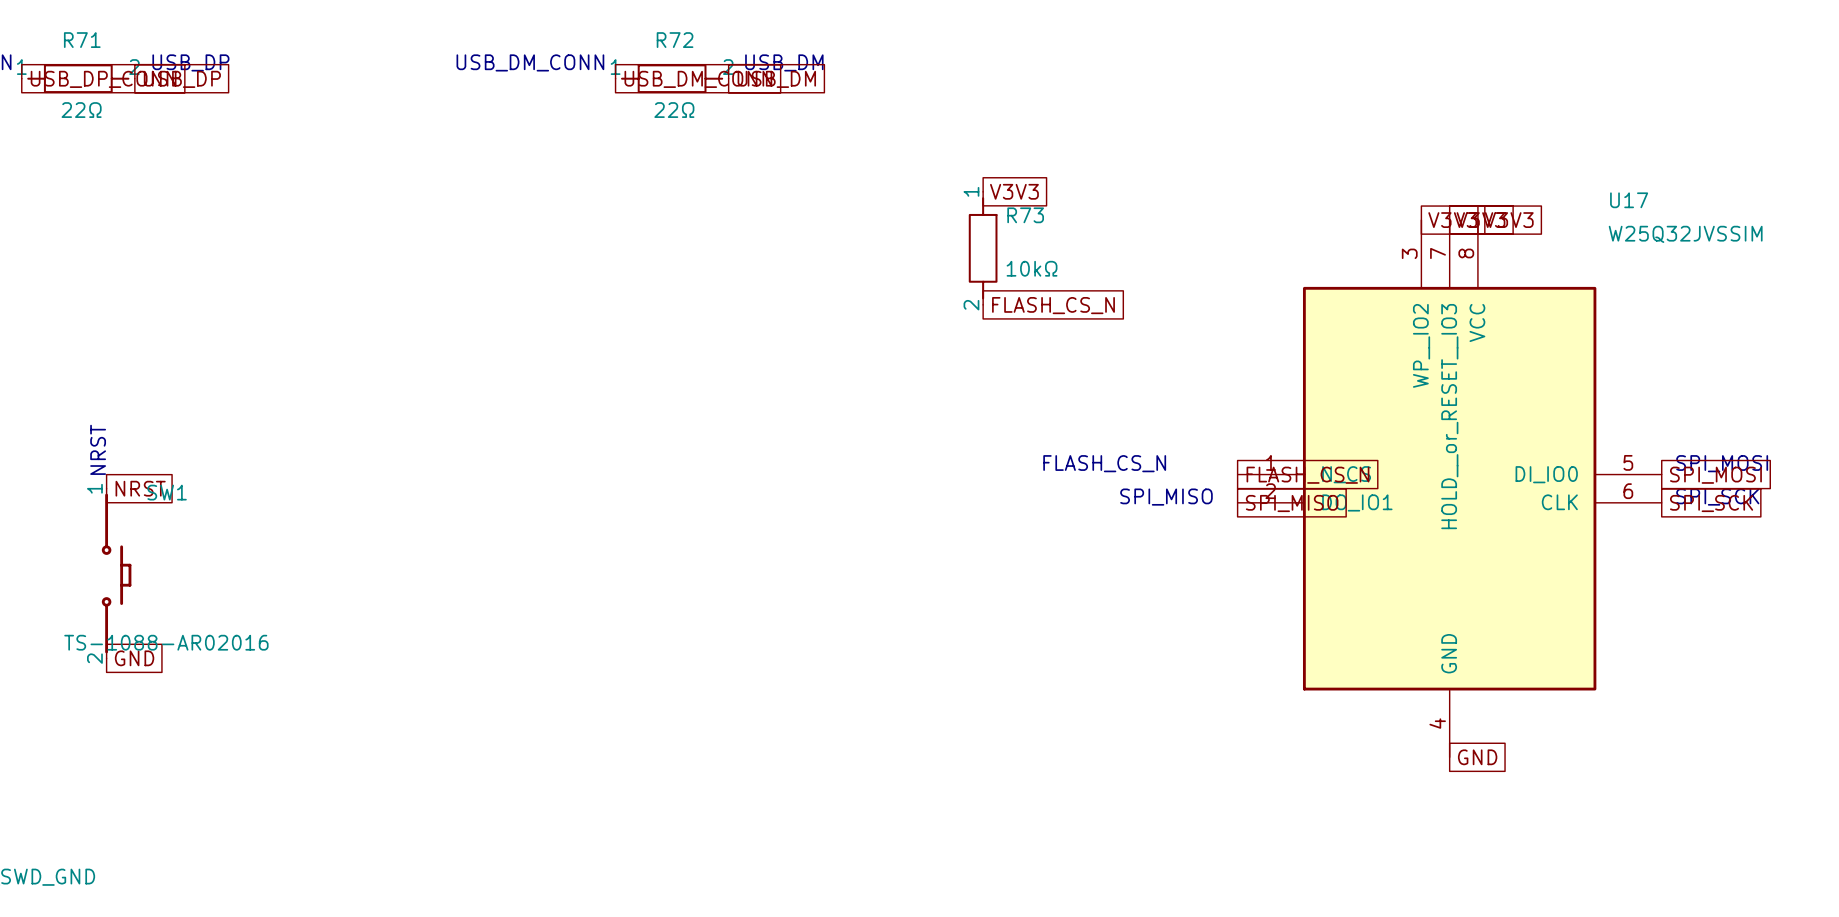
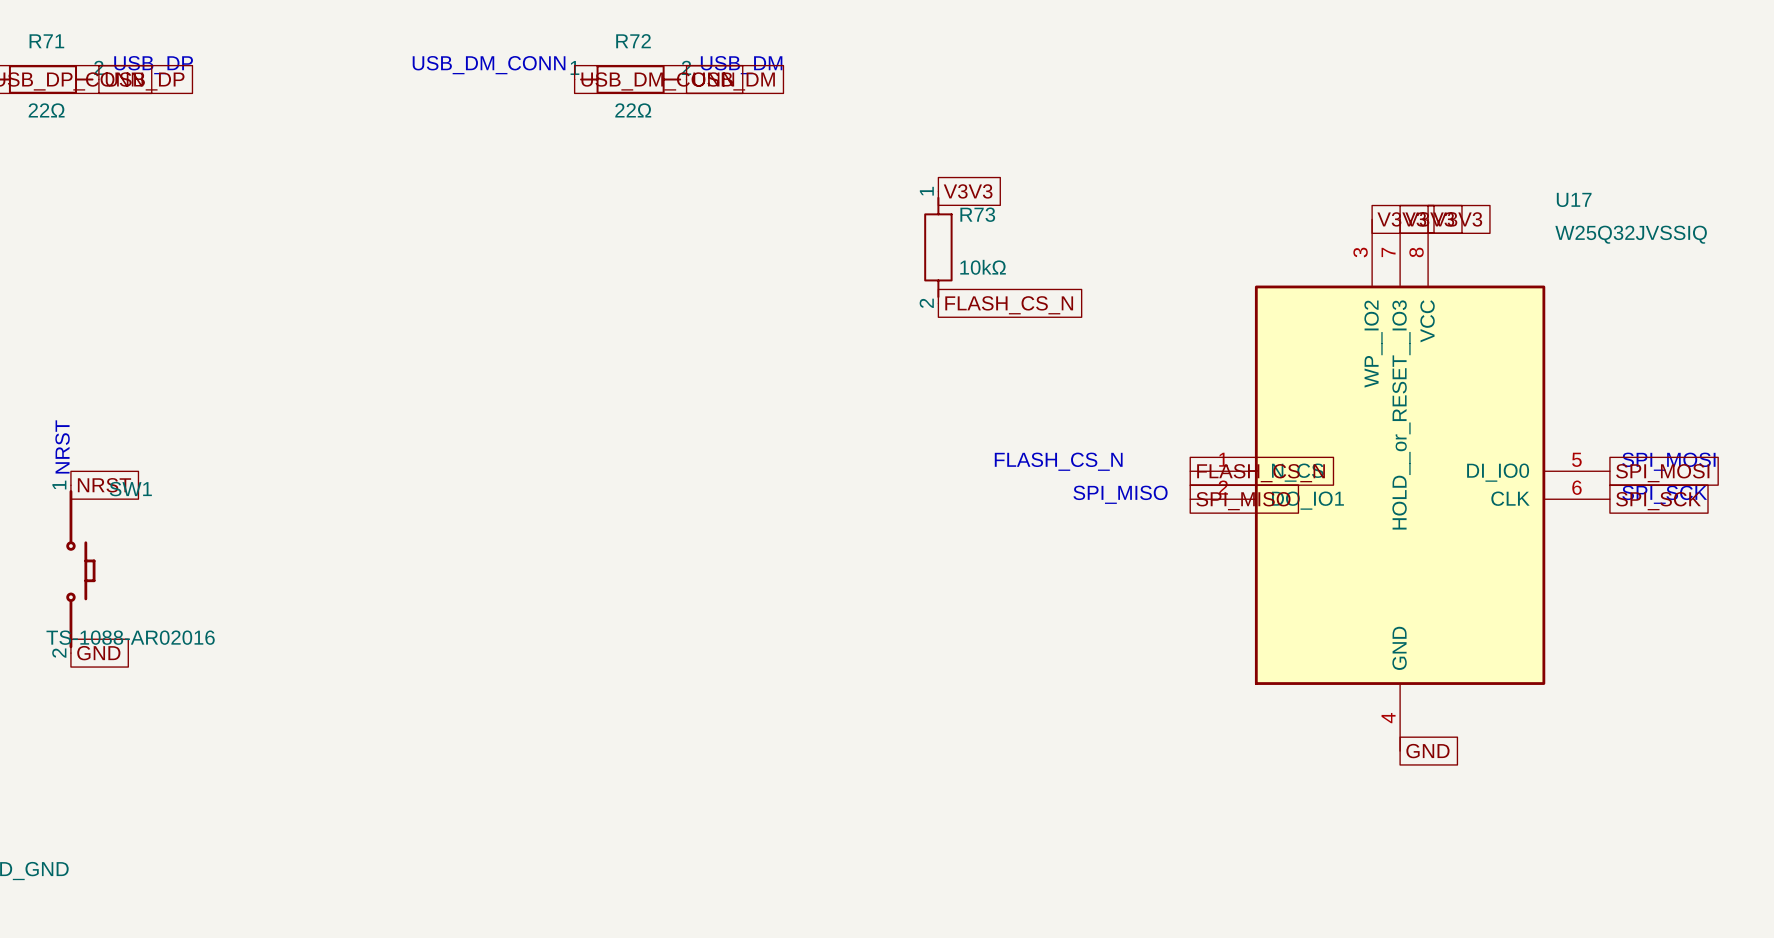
U17 value: W25Q32JVSSIM (1685, 234) -> W25Q32JVSSIQ (1631, 234)

